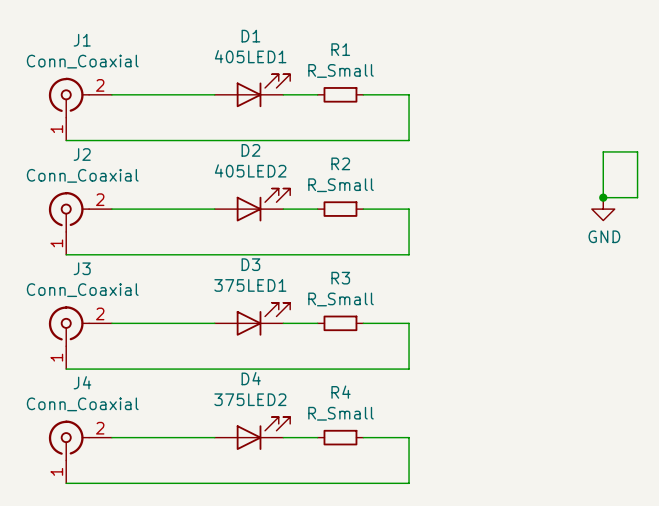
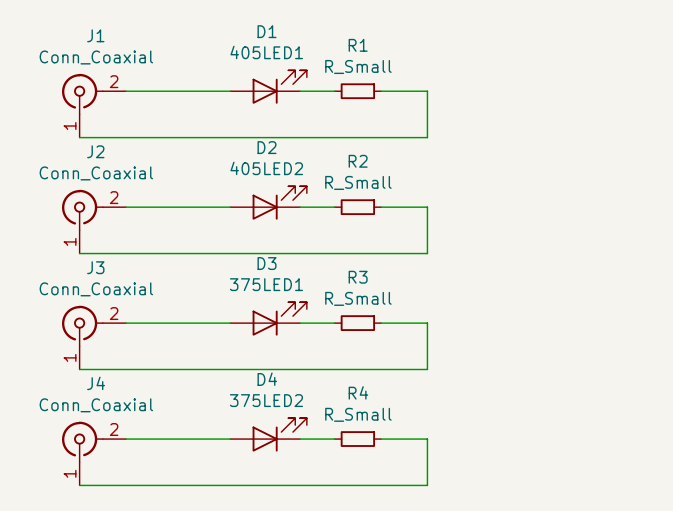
wire: (603, 151) (603, 197) (637, 197) (637, 151) (603, 151) -> none
junction: (603, 197) -> none
power symbol: GND (603, 209) -> none

